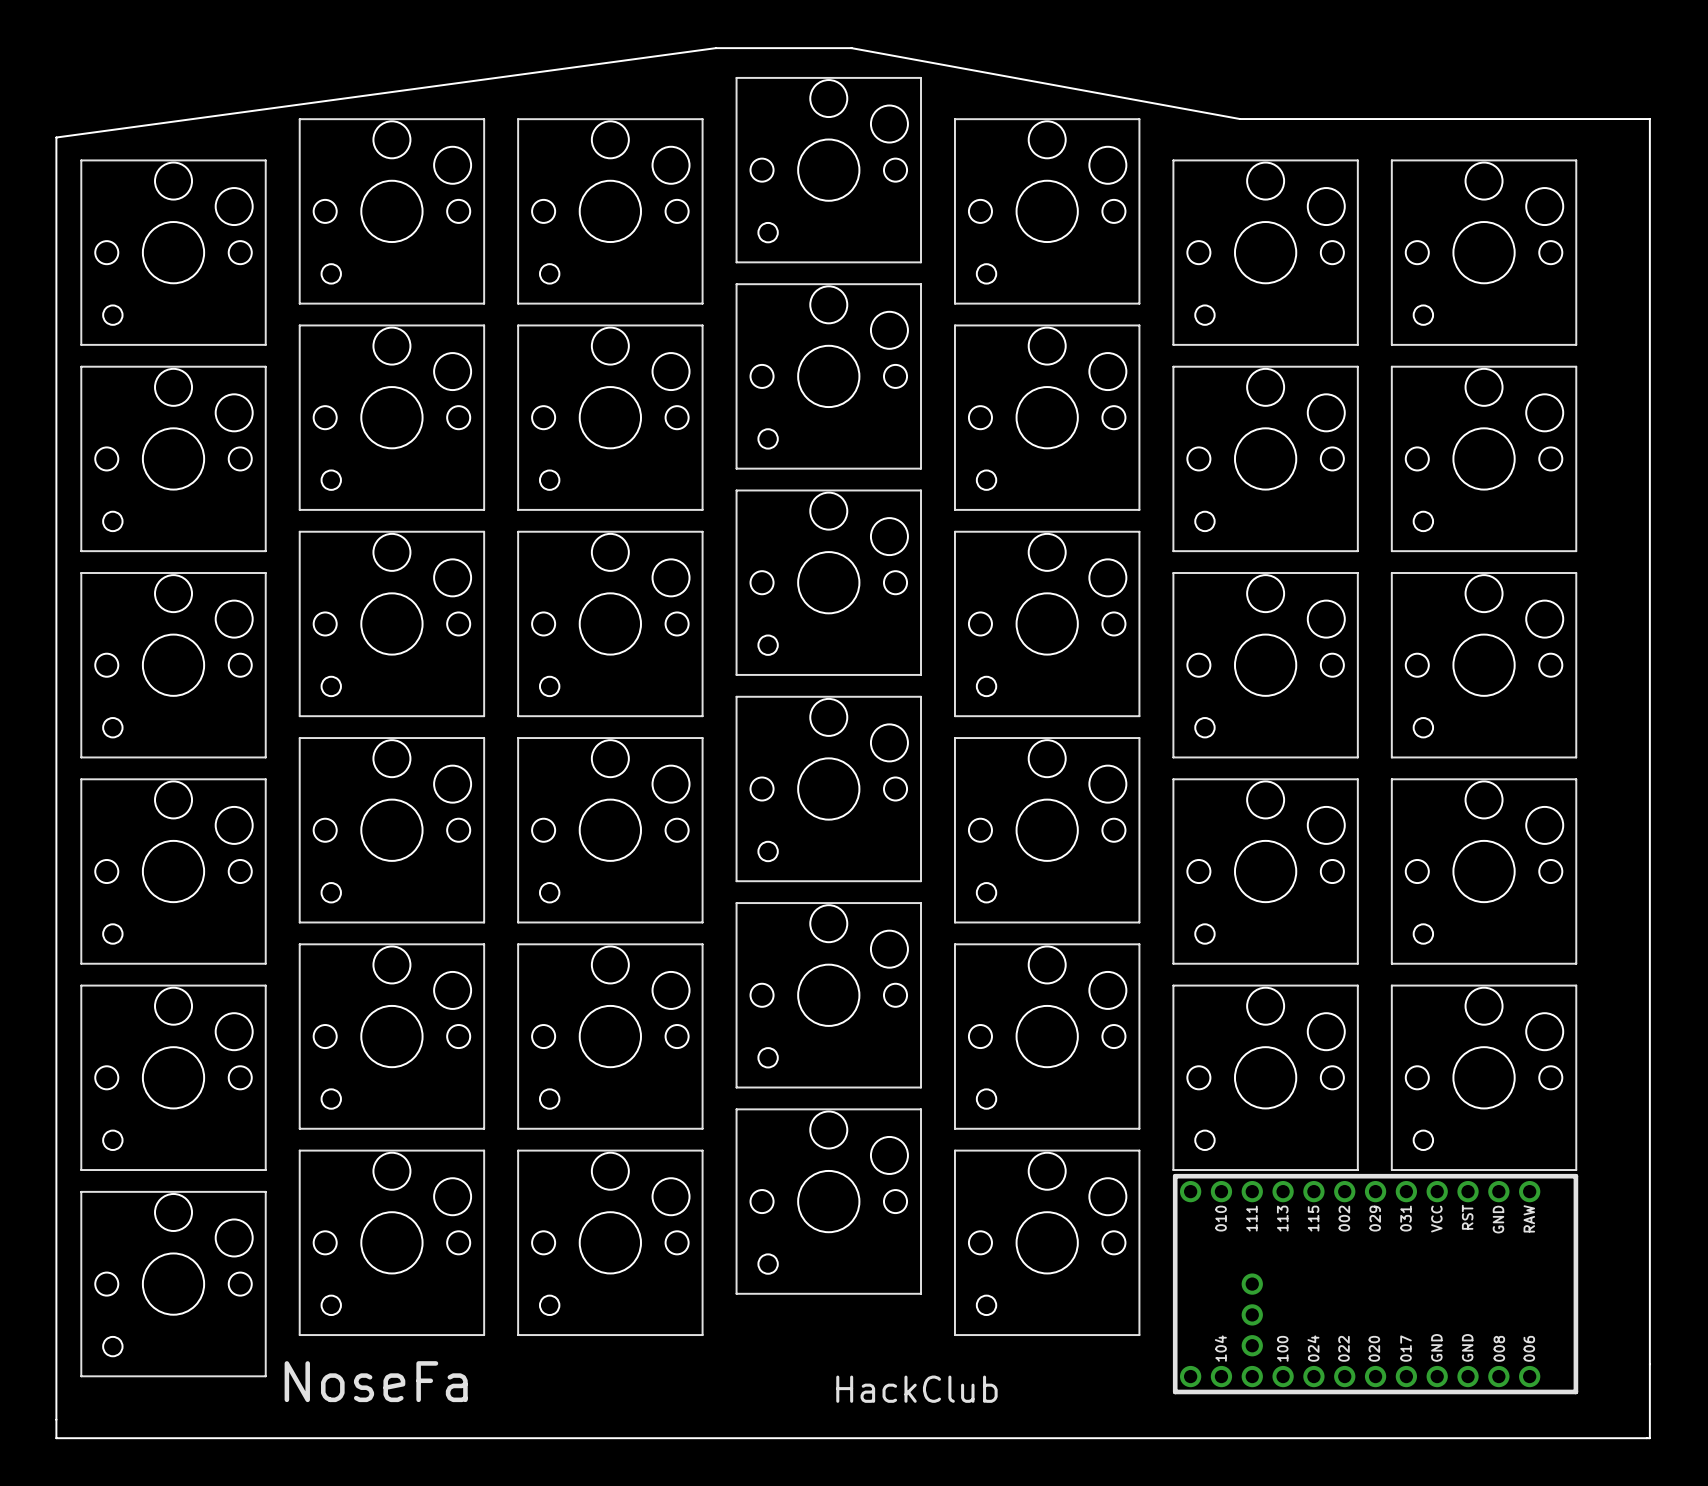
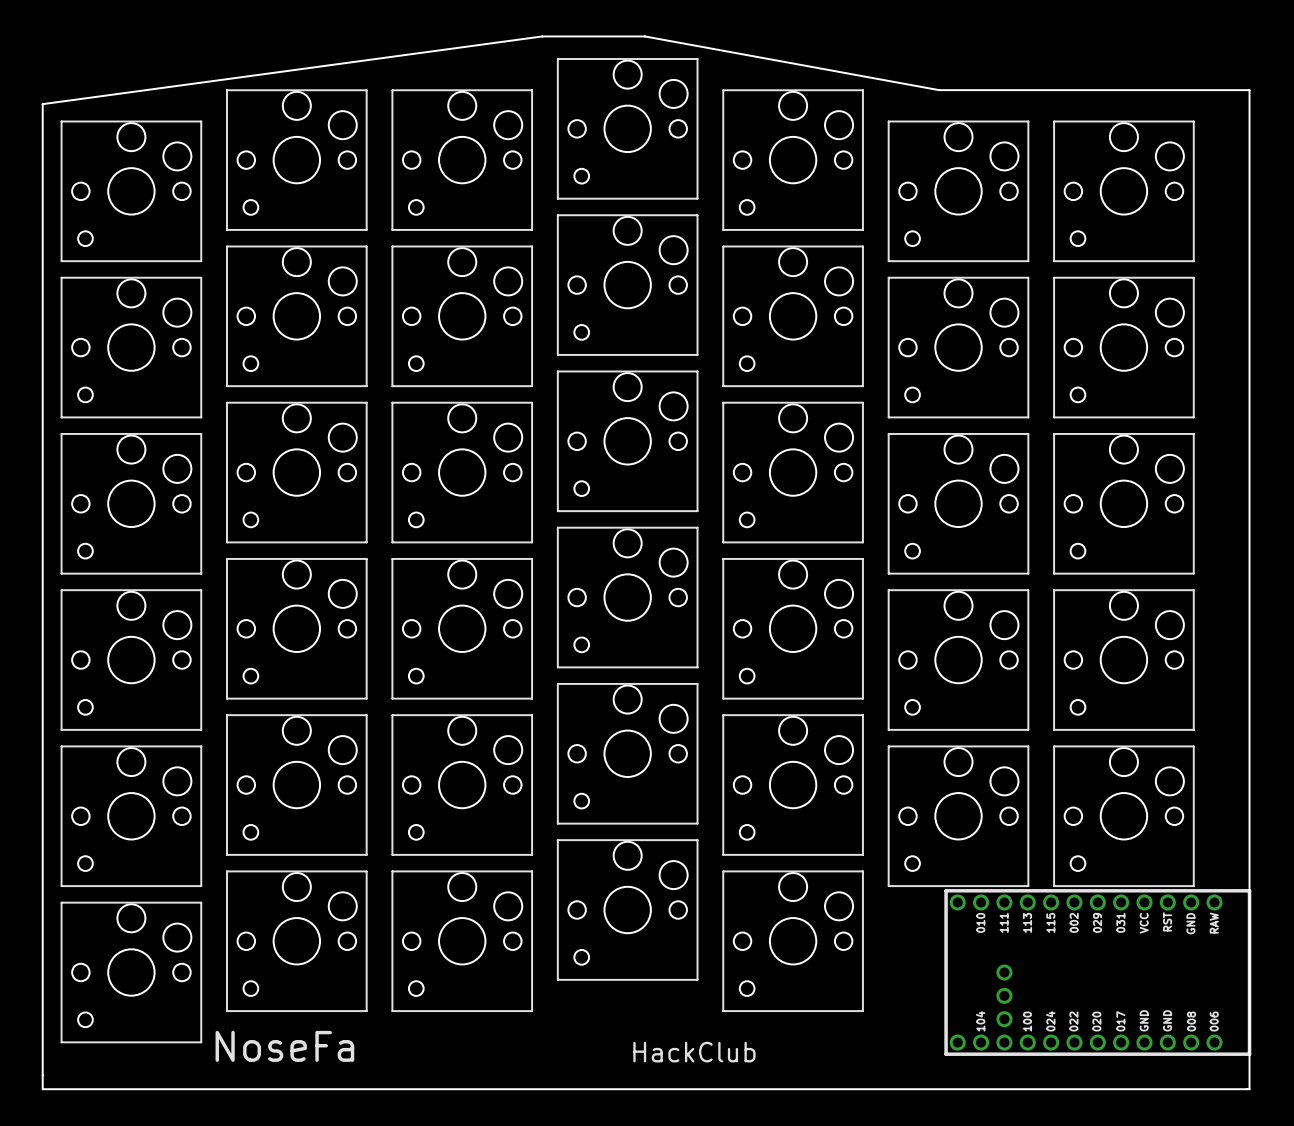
part position: (1375, 1284) -> (1097, 972)

